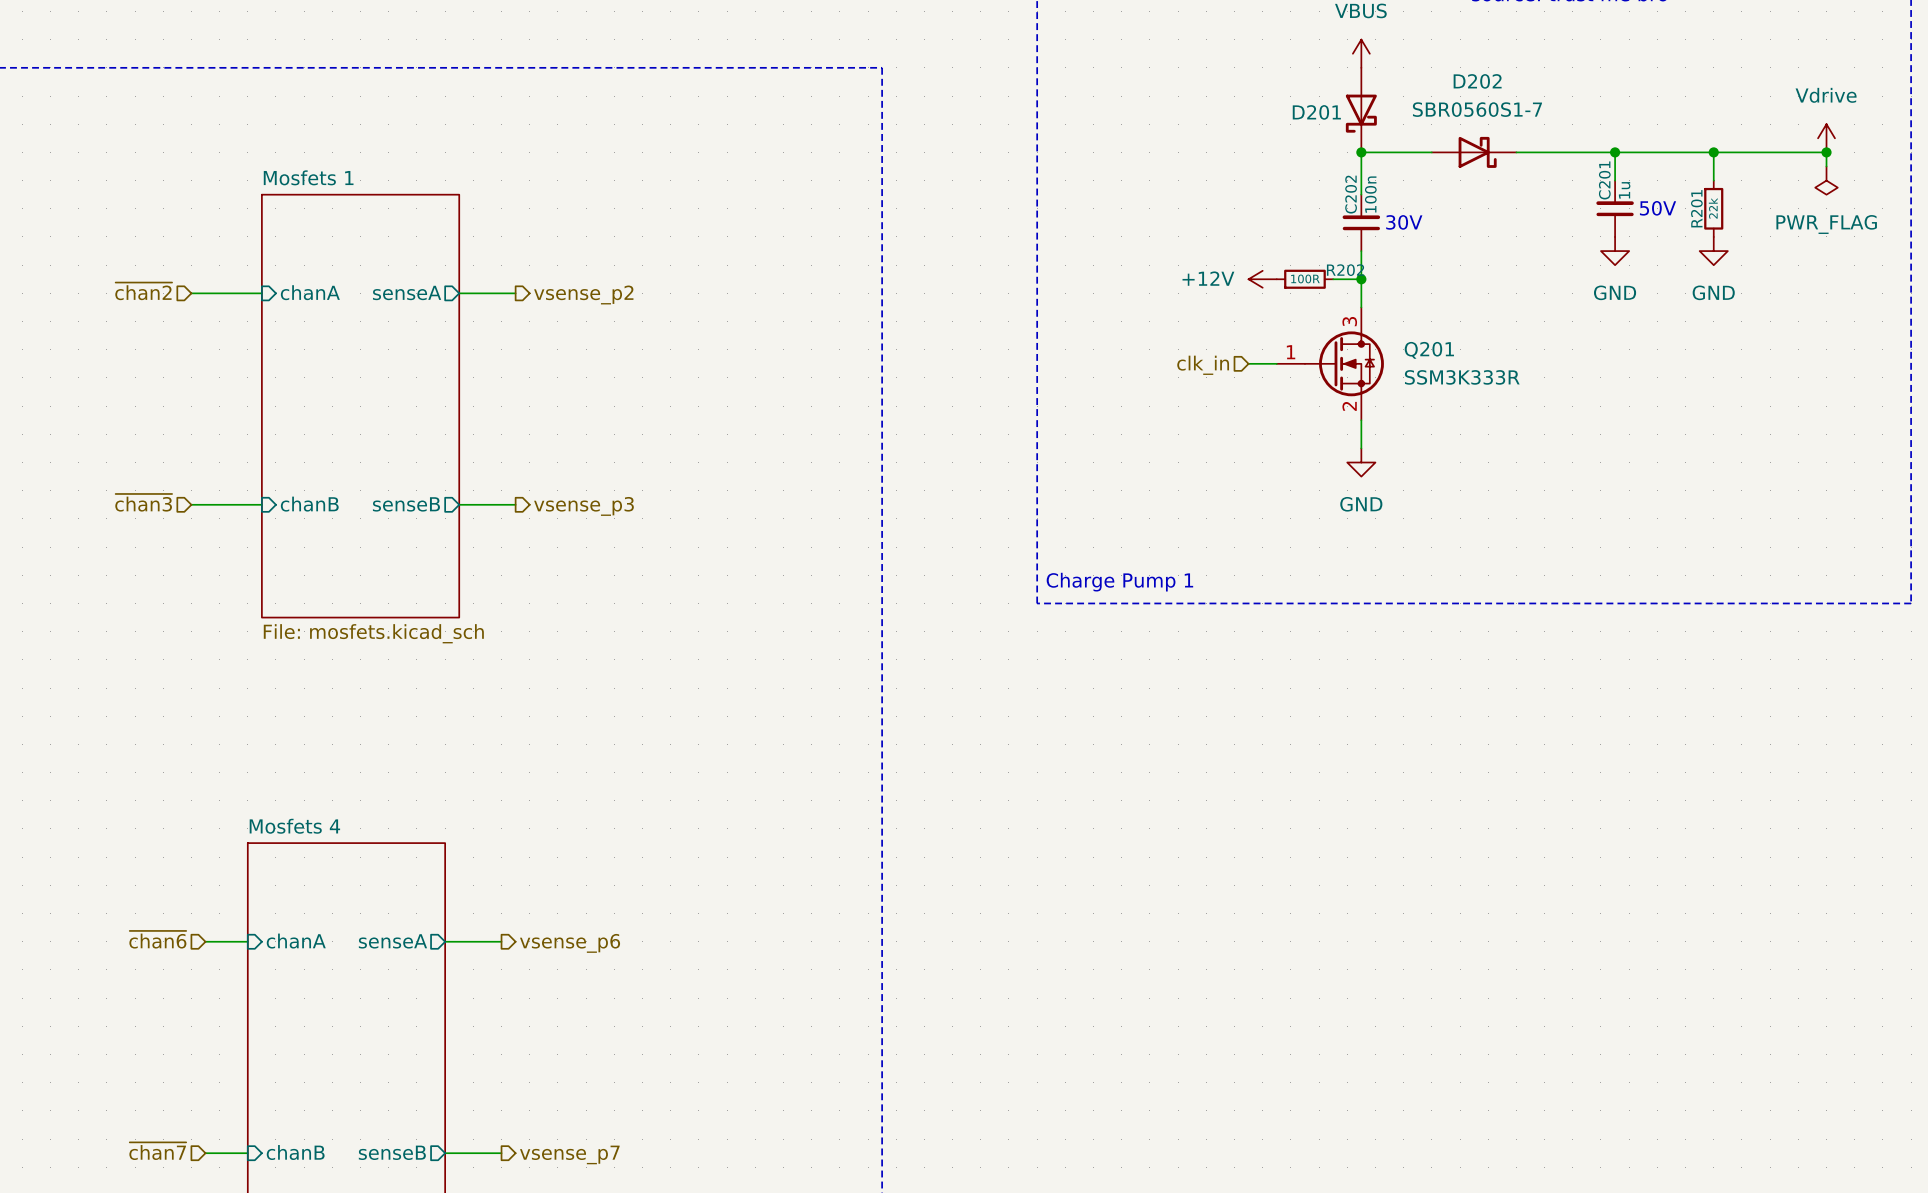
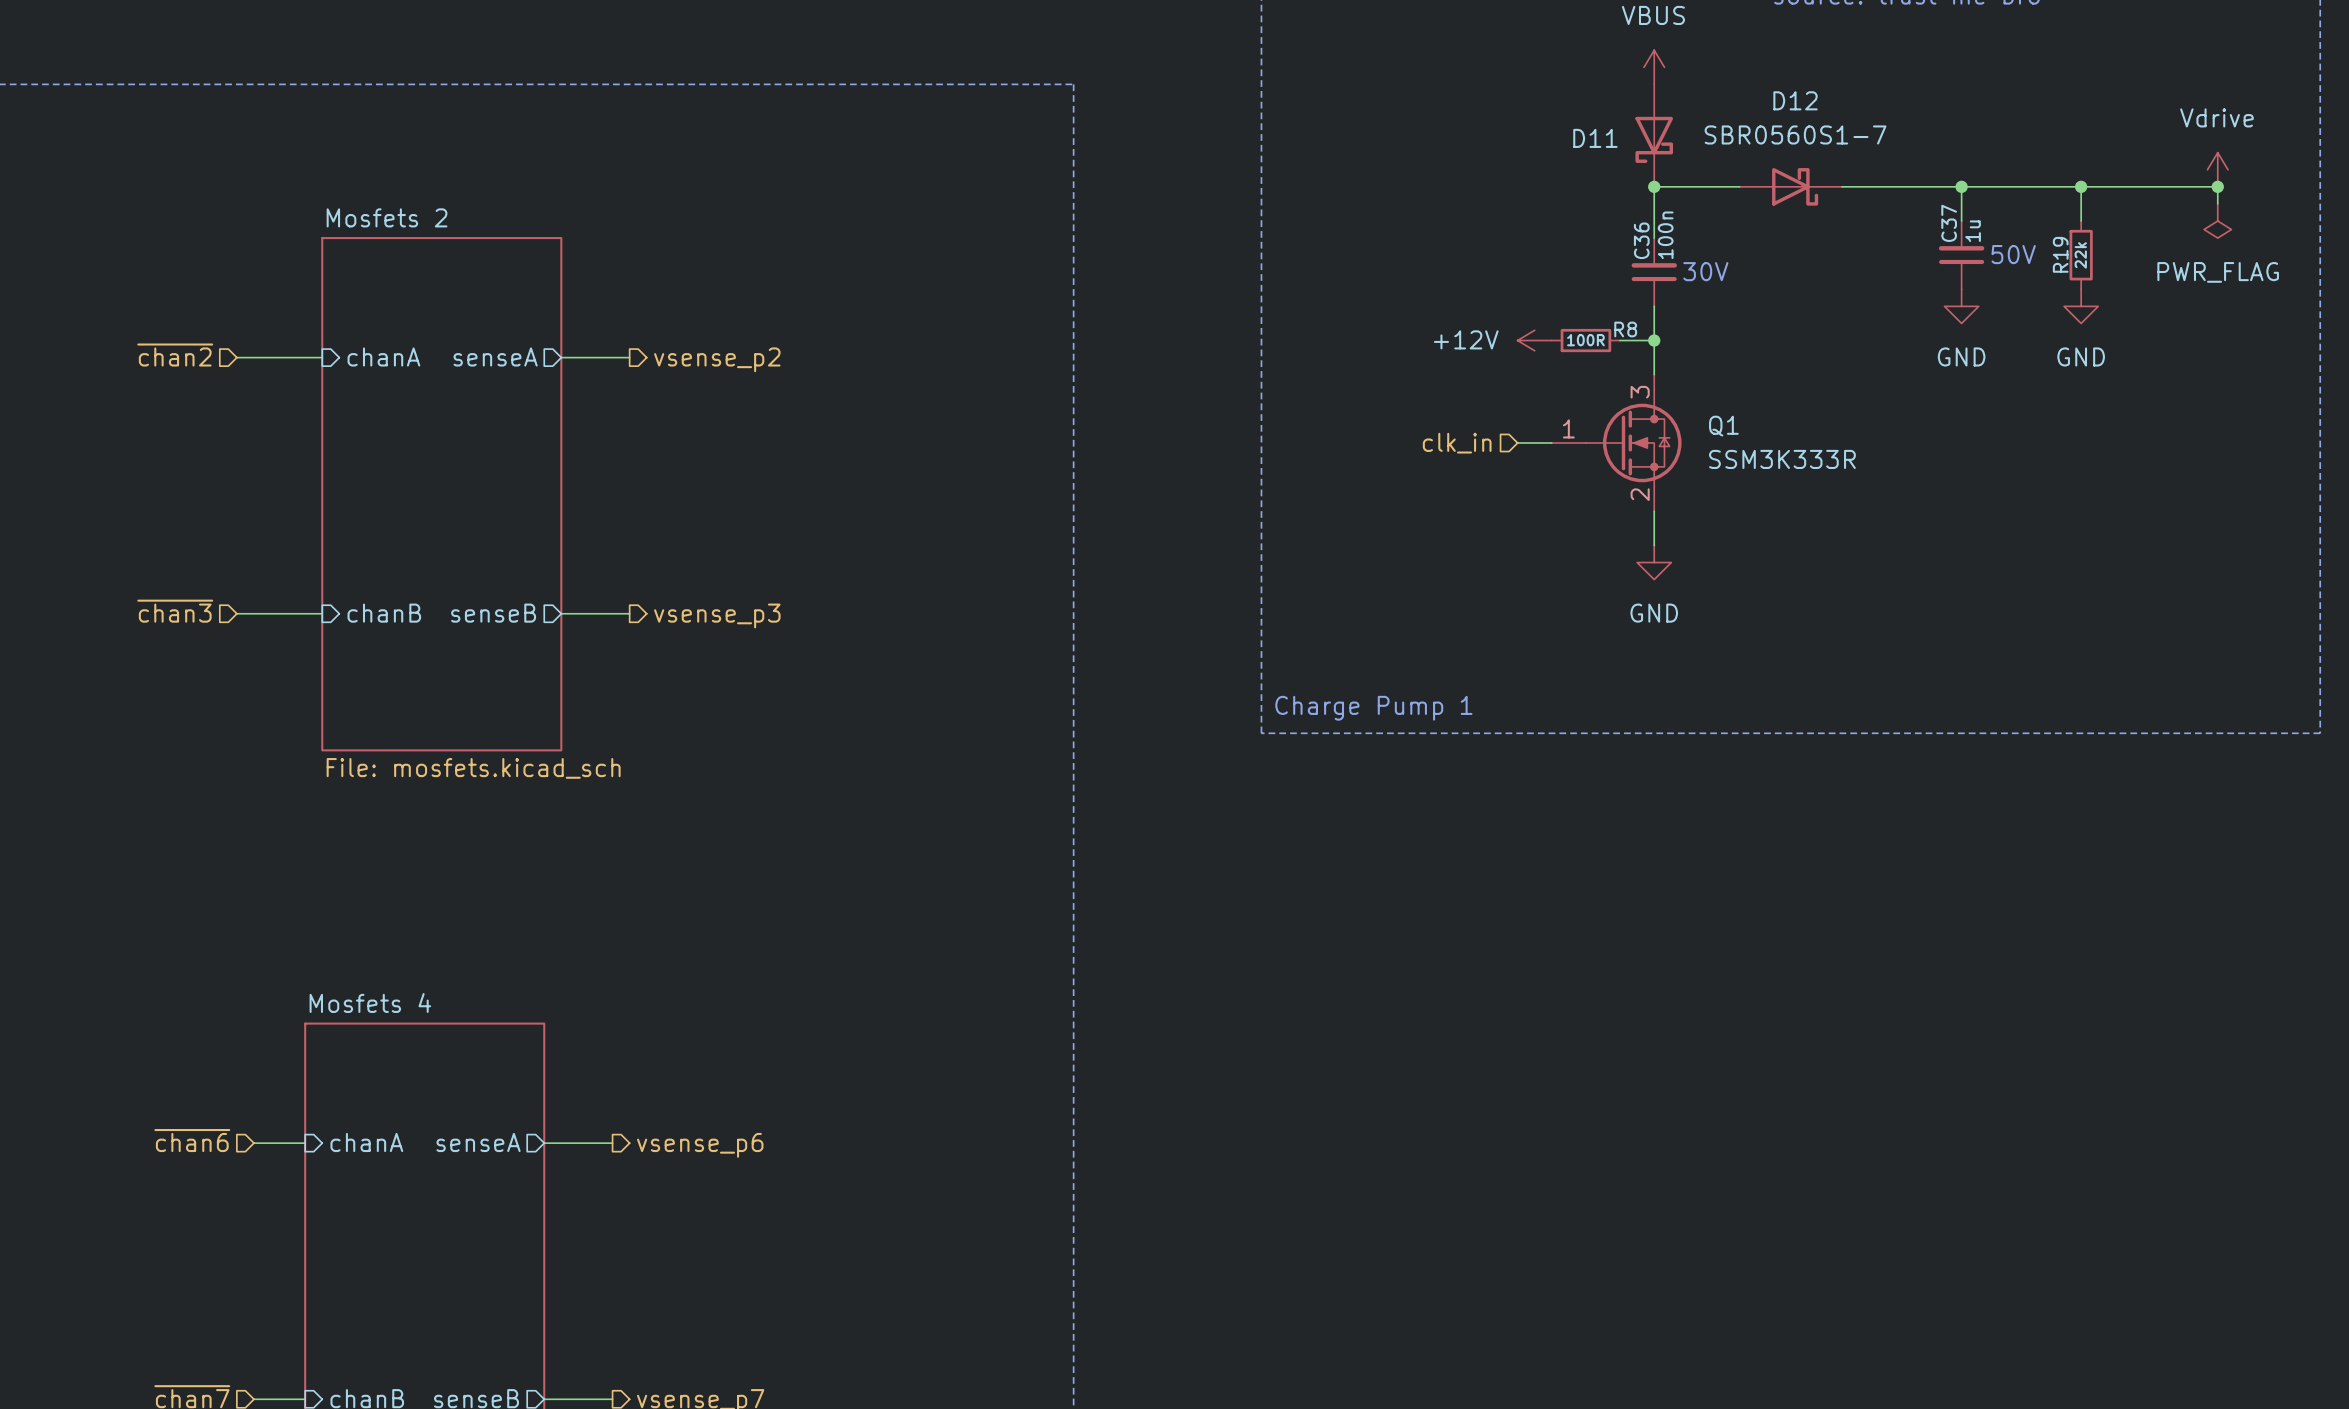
D202 name: D202 (1477, 81) -> D12 (1795, 100)
D201 name: D201 (1316, 112) -> D11 (1595, 138)
sheet Mosfets 1 name: Mosfets 1 (308, 177) -> Mosfets 2 (387, 217)
C201 name: C201 (1604, 180) -> C37 (1949, 223)
C202 name: C202 (1351, 194) -> C36 (1641, 240)
R201 name: R201 (1696, 208) -> R19 (2060, 254)
R202 name: R202 (1345, 270) -> R8 (1625, 329)
Q201 name: Q201 (1429, 350) -> Q1 (1723, 426)

